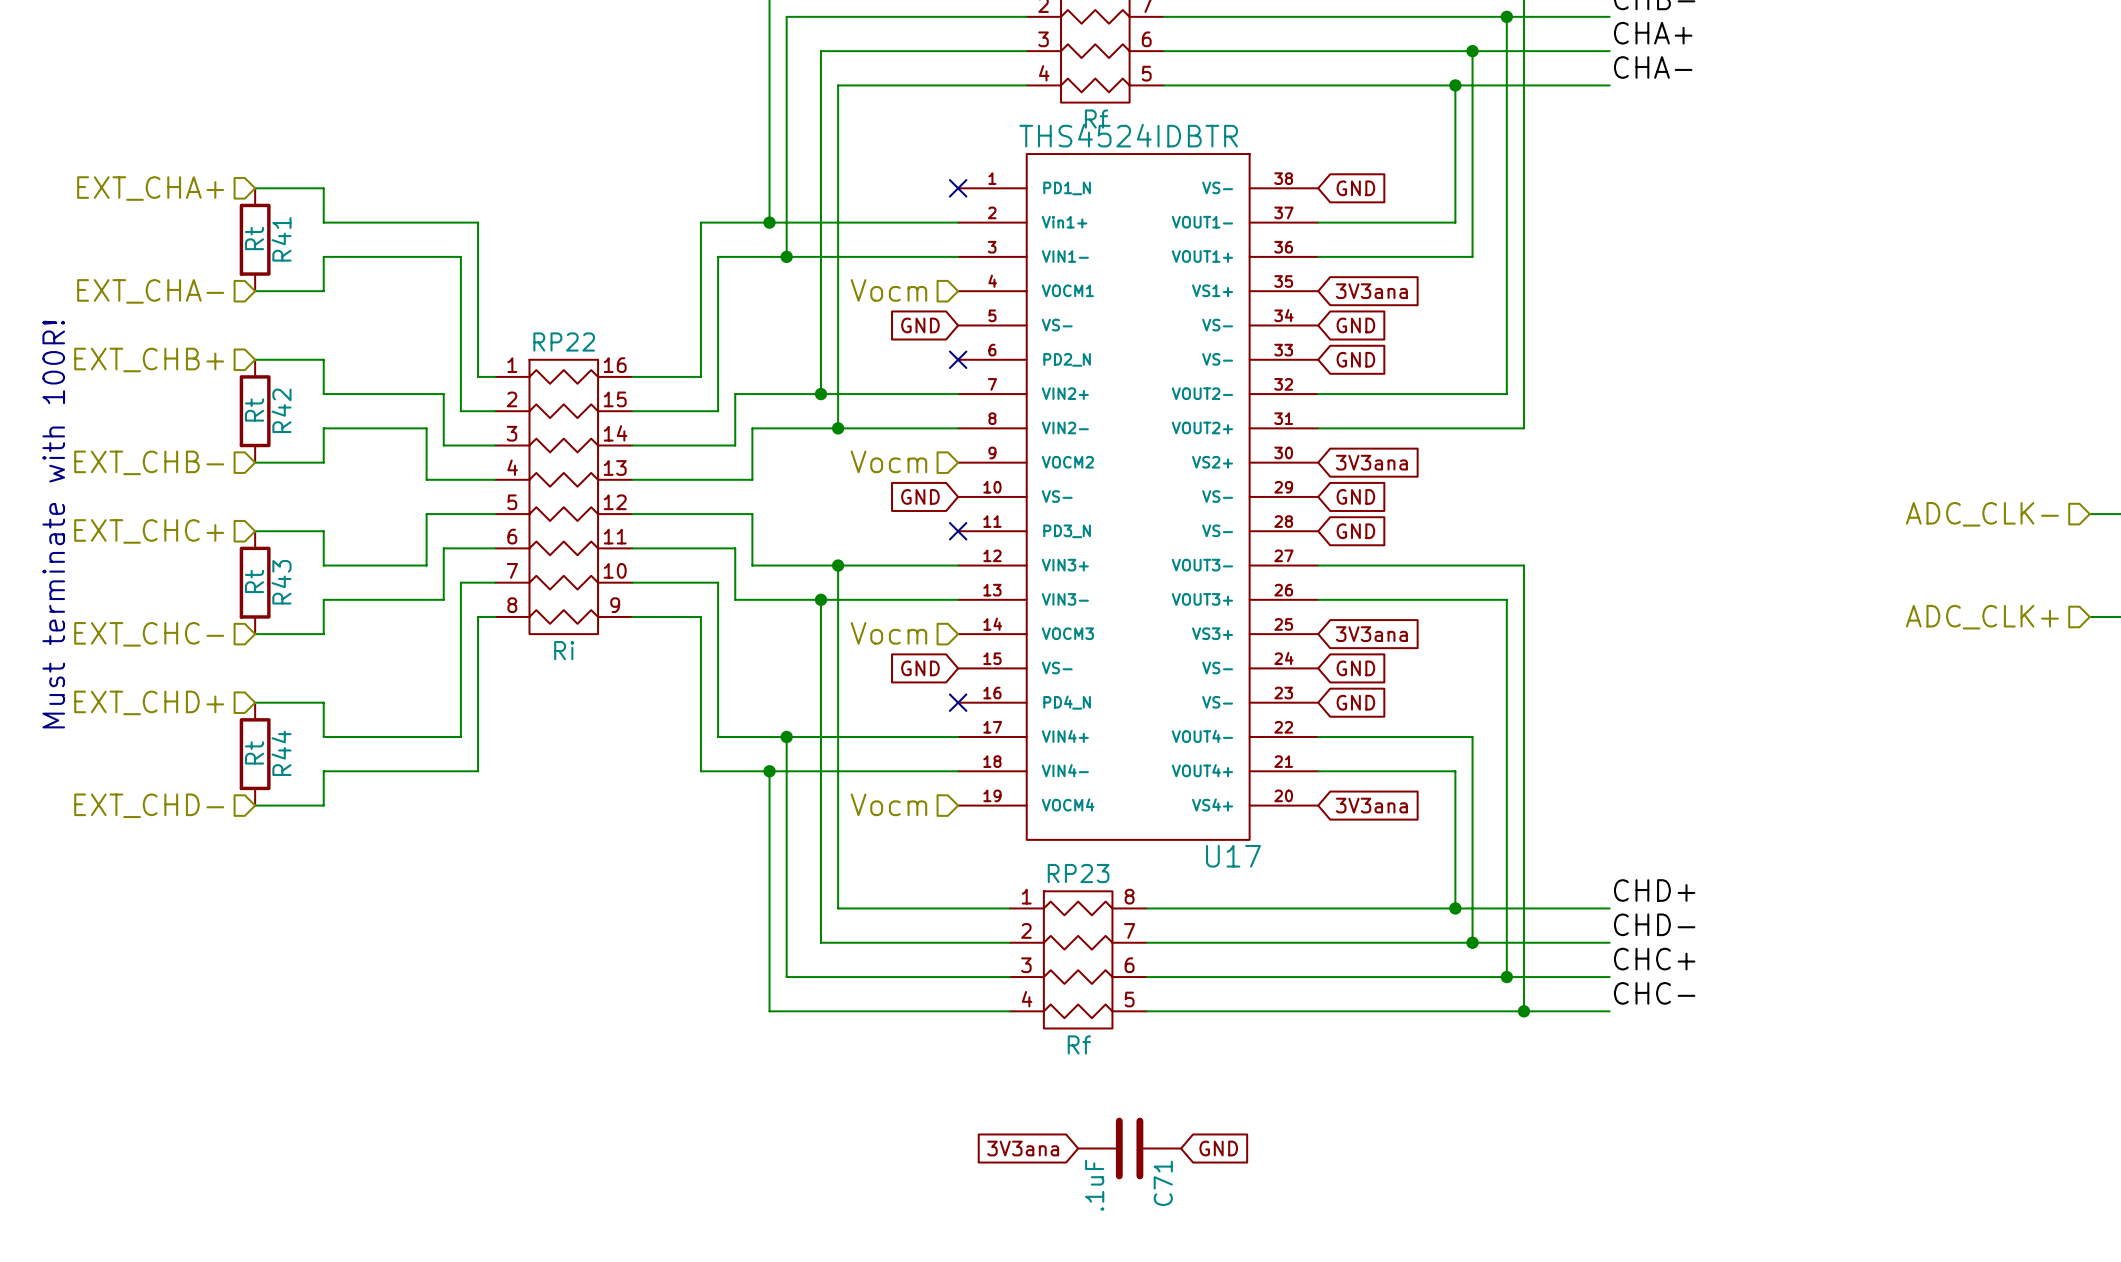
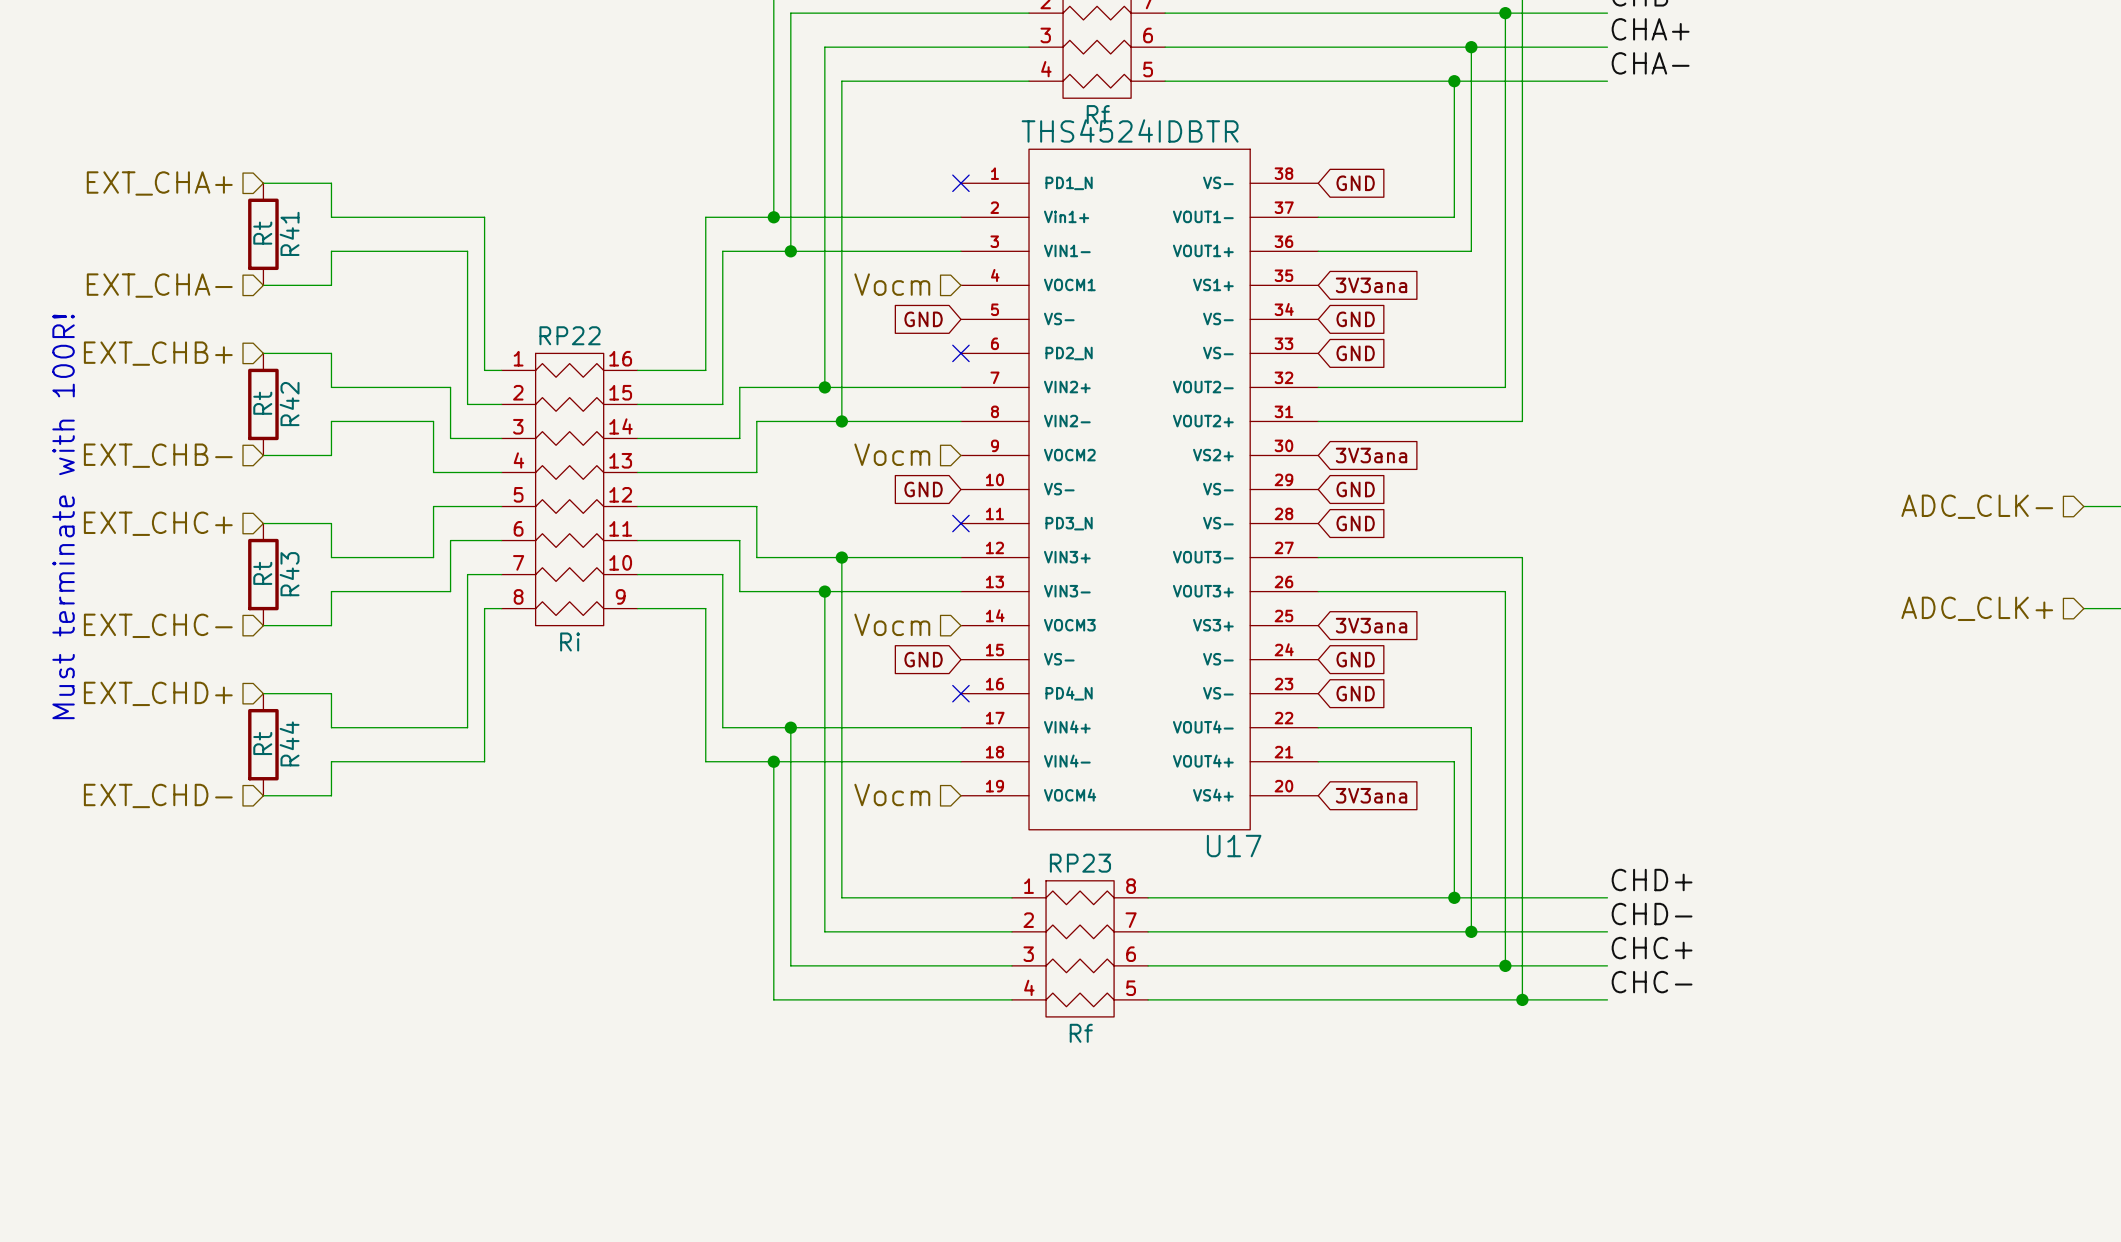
global label: 3V3ana (1023, 1148) -> none
C71: .1uF (1129, 1148) -> none
global label: GND (1218, 1148) -> none

